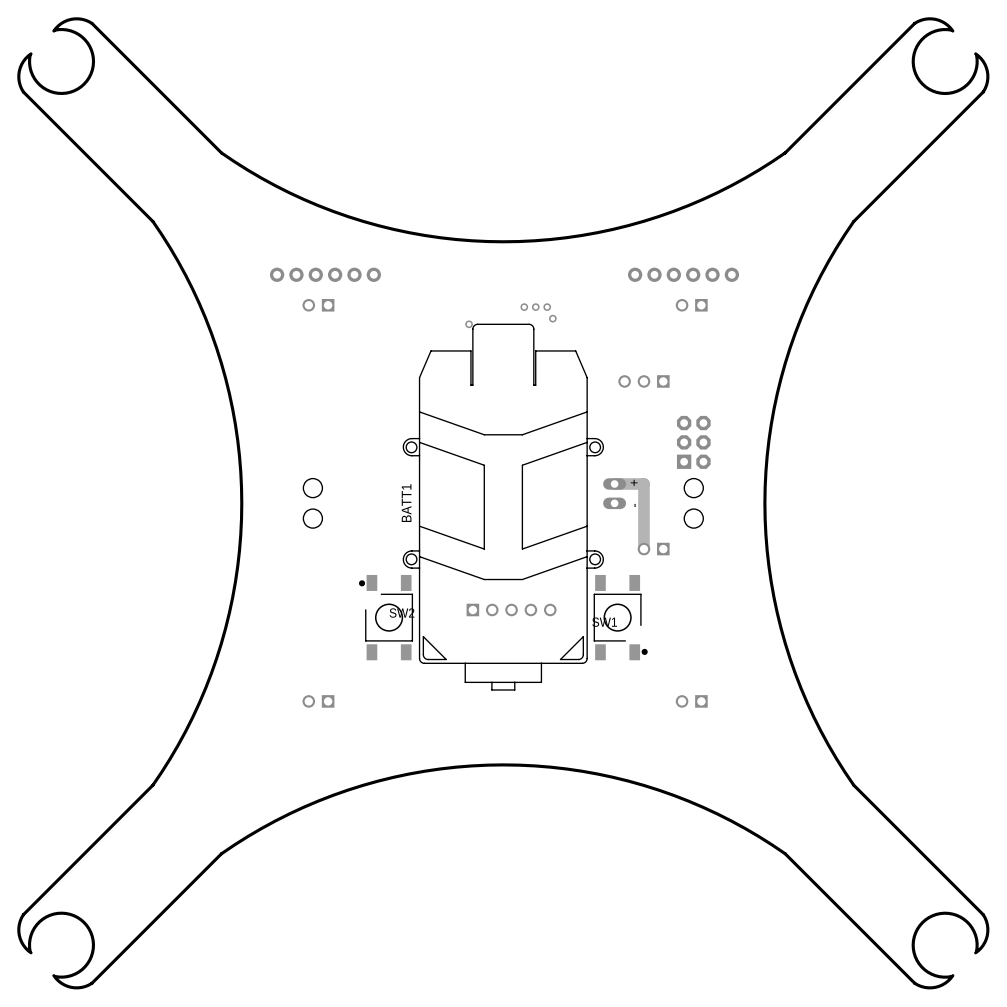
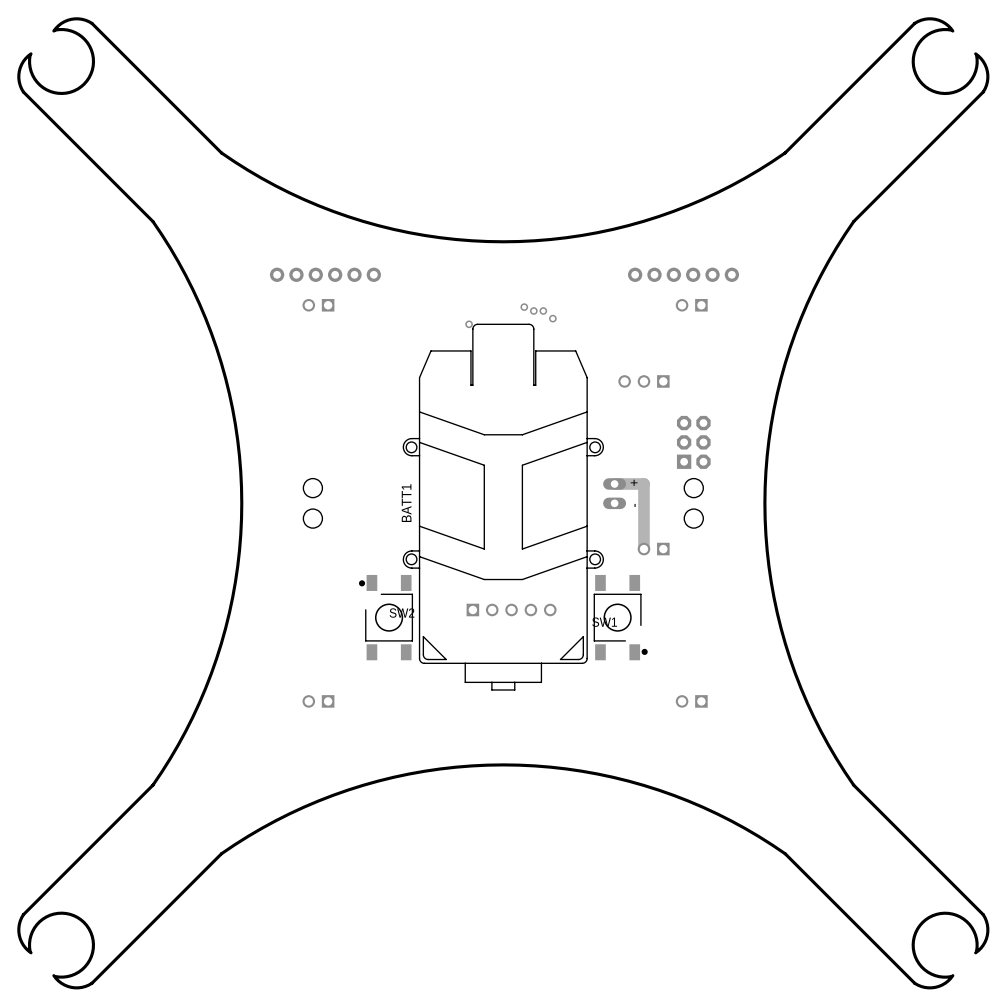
via: (535, 307) -> none
via: (547, 307) -> none
via: none -> (533, 310)
via: none -> (543, 310)

